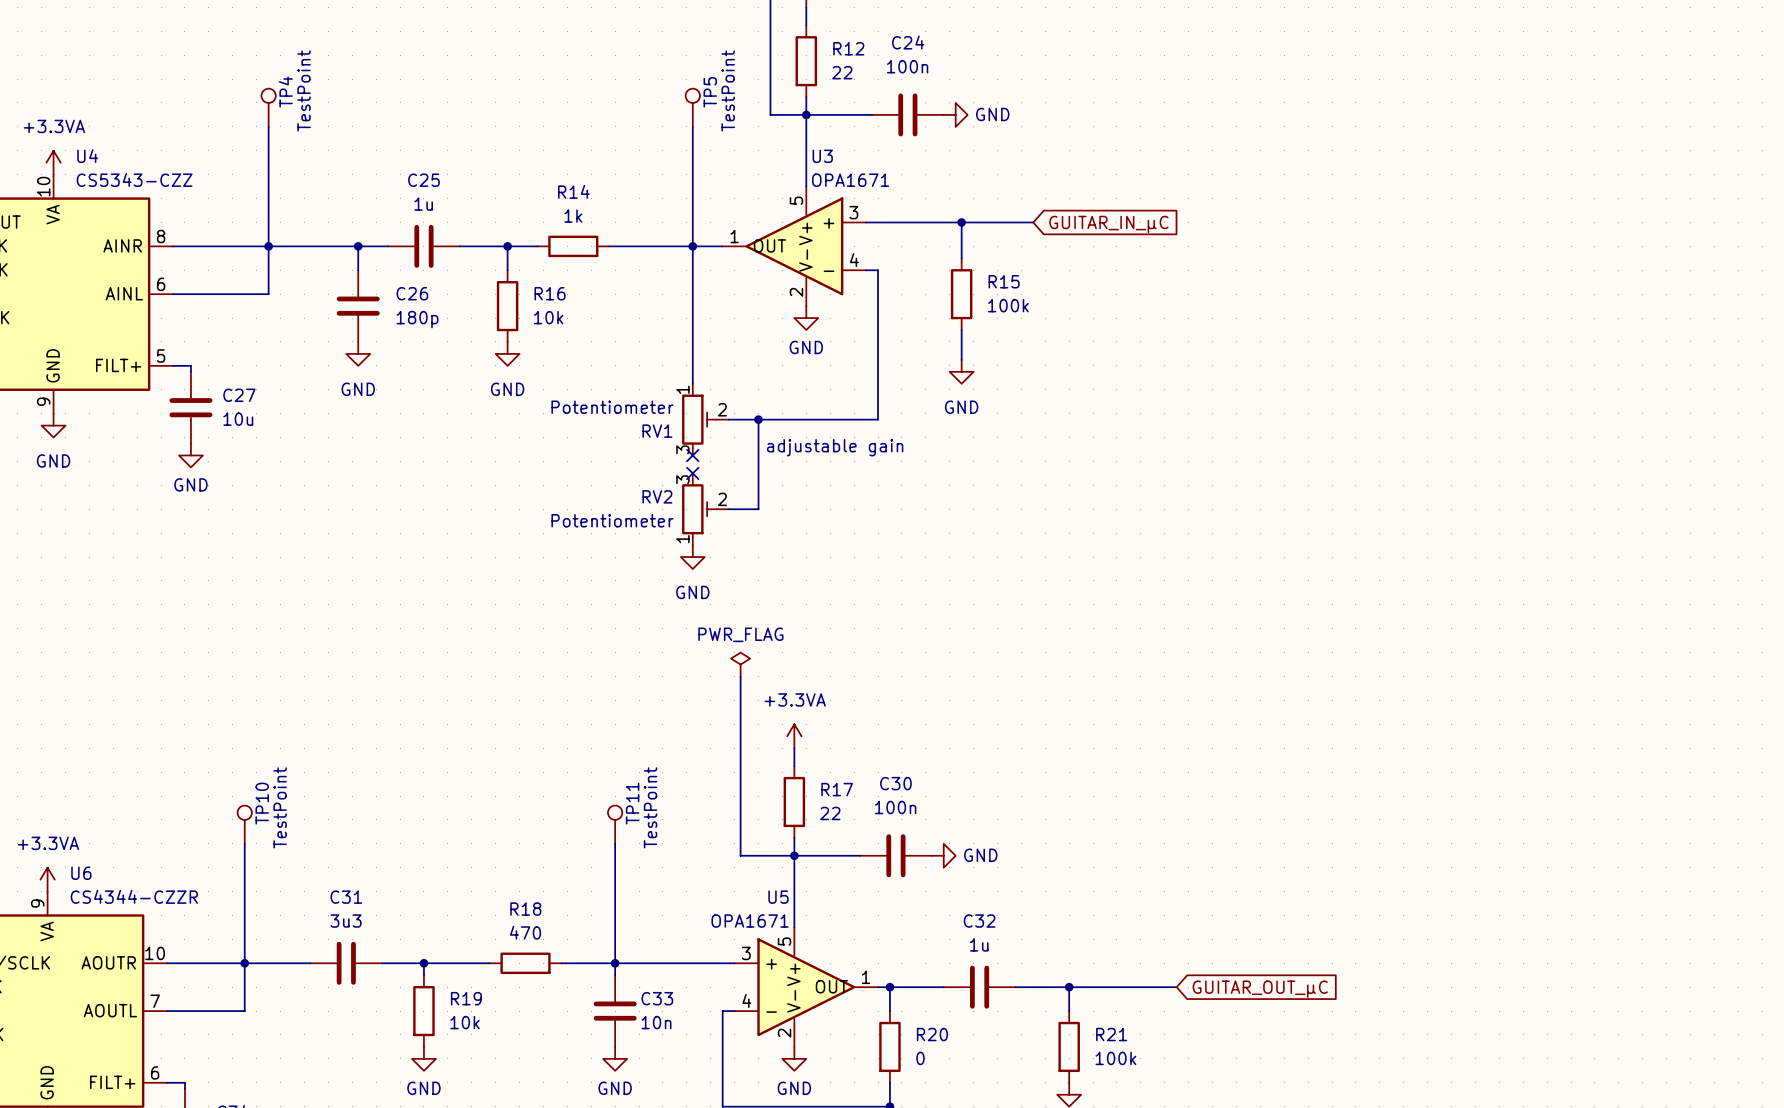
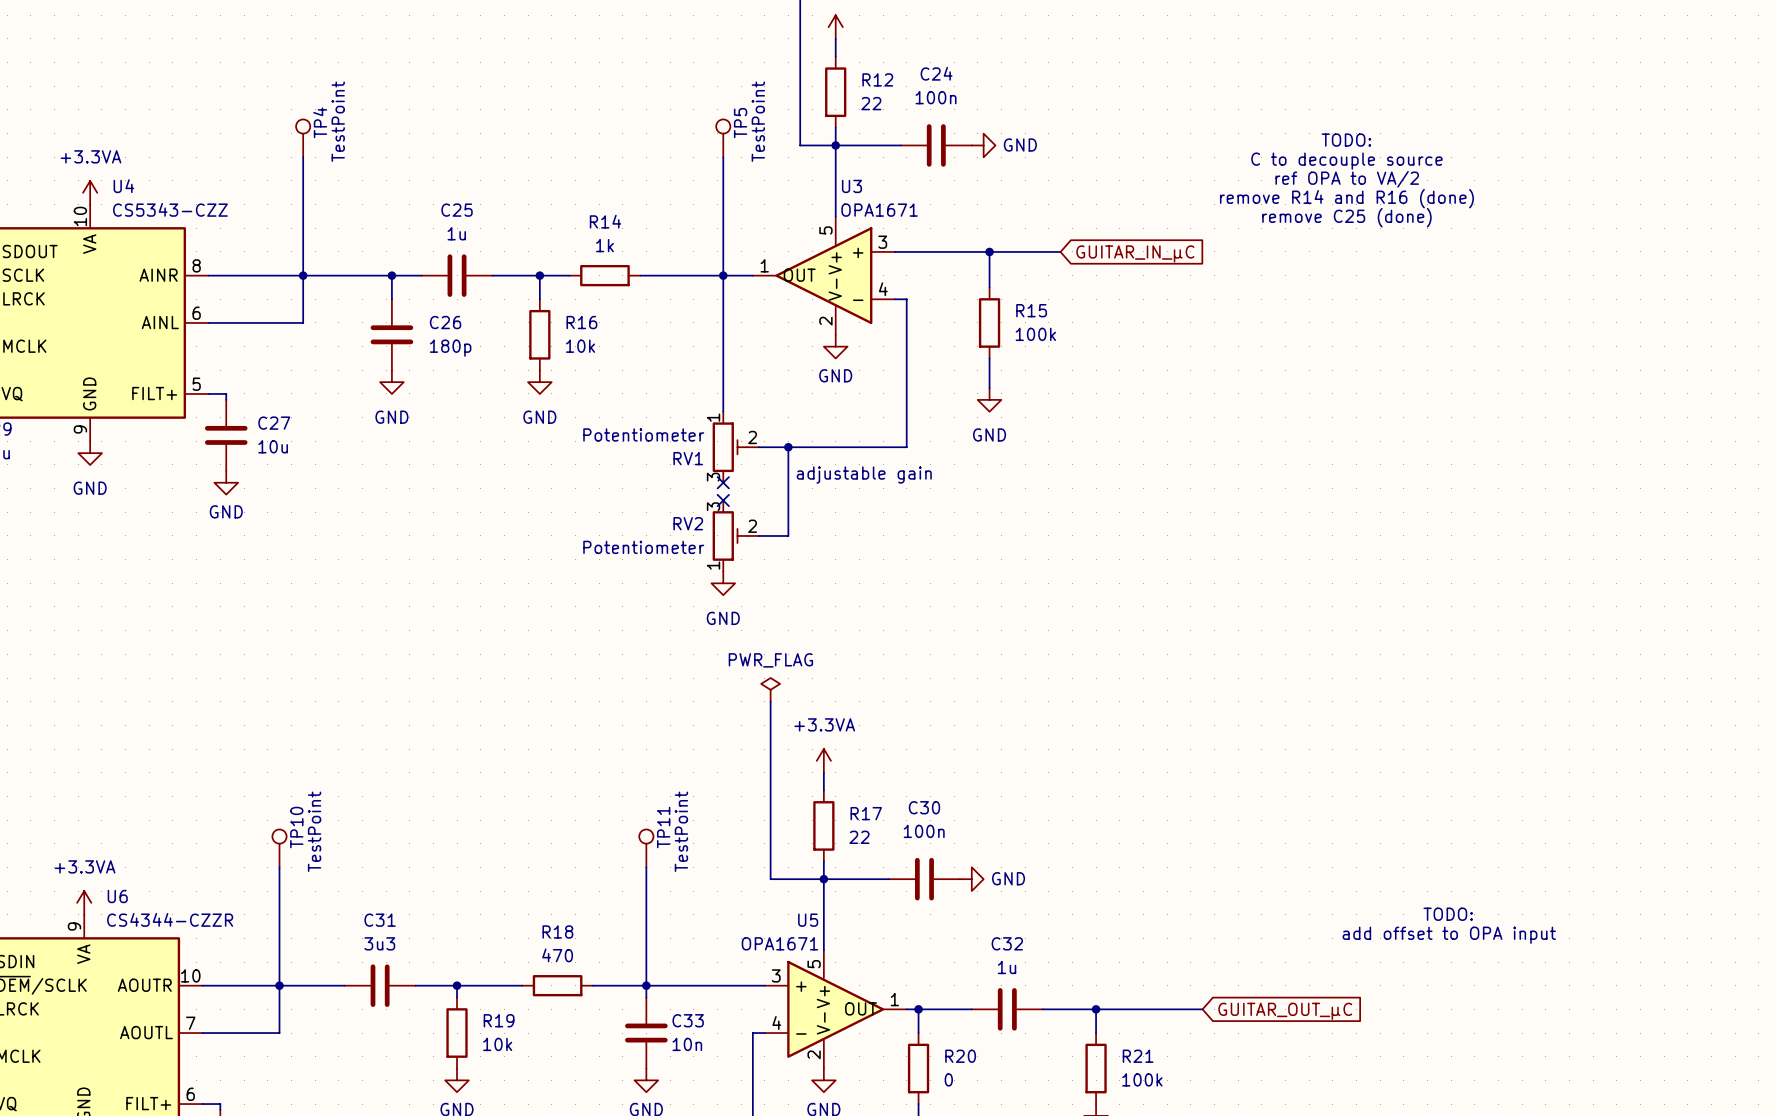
text: none -> TODO: (1346, 140)
text: none -> C to decouple source (1346, 161)
text: none -> ref OPA to VA/2 (1347, 179)
text: none -> remove R14 and R16 (done) (1346, 198)
text: none -> remove C25 (done) (1346, 217)
text: none -> TODO: (1448, 914)
text: none -> add offset to OPA input (1449, 935)

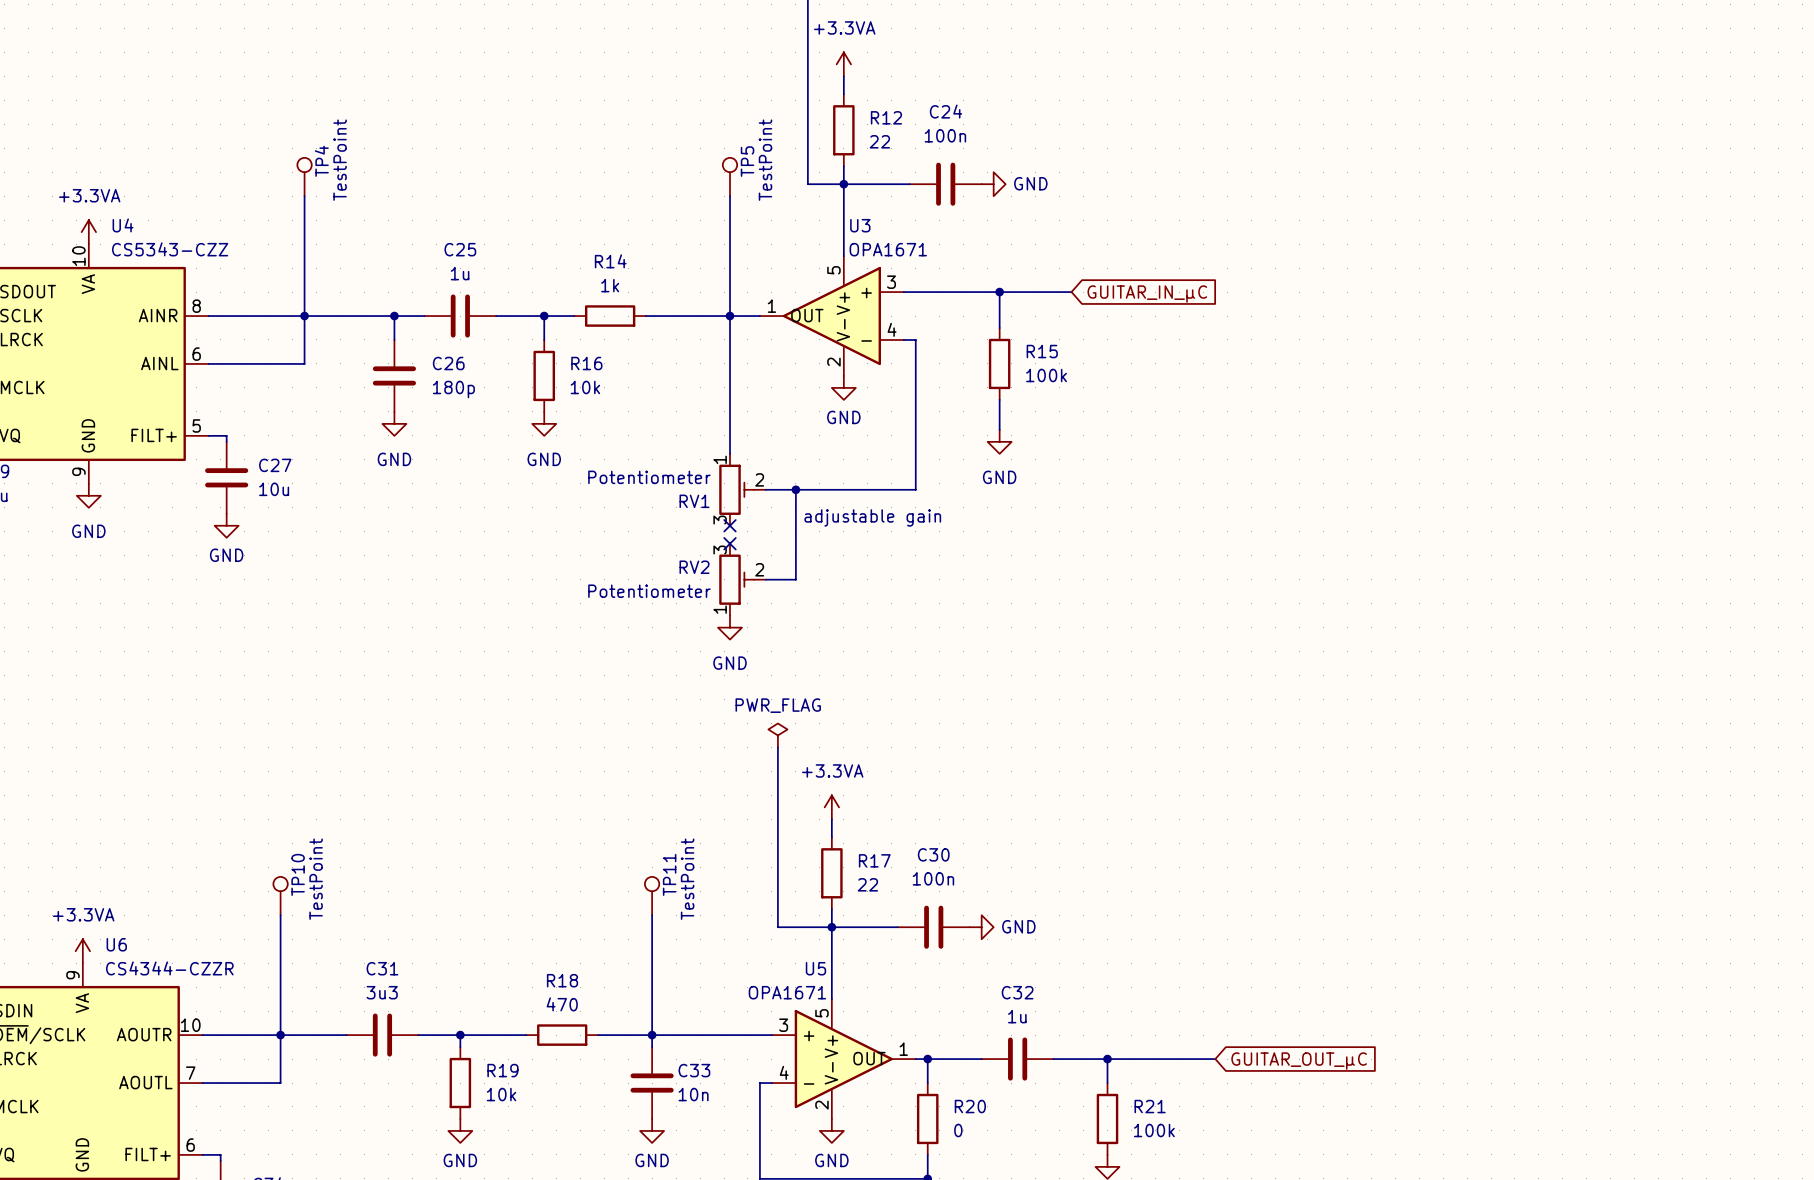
text: TODO: (1346, 140) -> none
text: C to decouple source (1346, 161) -> none
text: ref OPA to VA/2 (1347, 179) -> none
text: remove R14 and R16 (done) (1346, 198) -> none
text: remove C25 (done) (1346, 217) -> none
text: TODO: (1448, 914) -> none
text: add offset to OPA input (1449, 935) -> none

